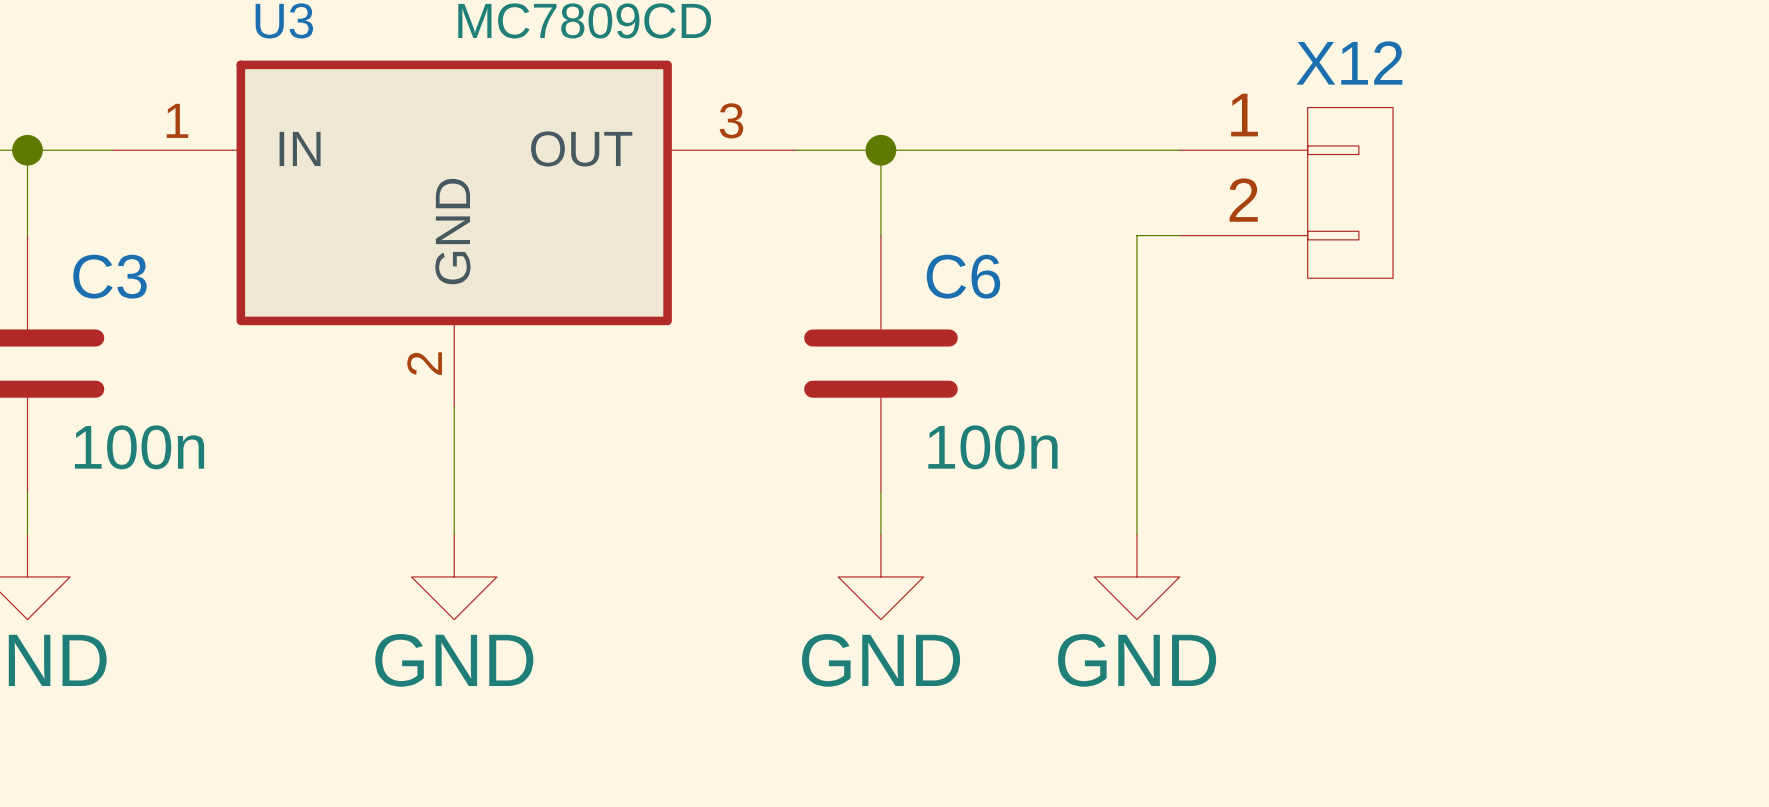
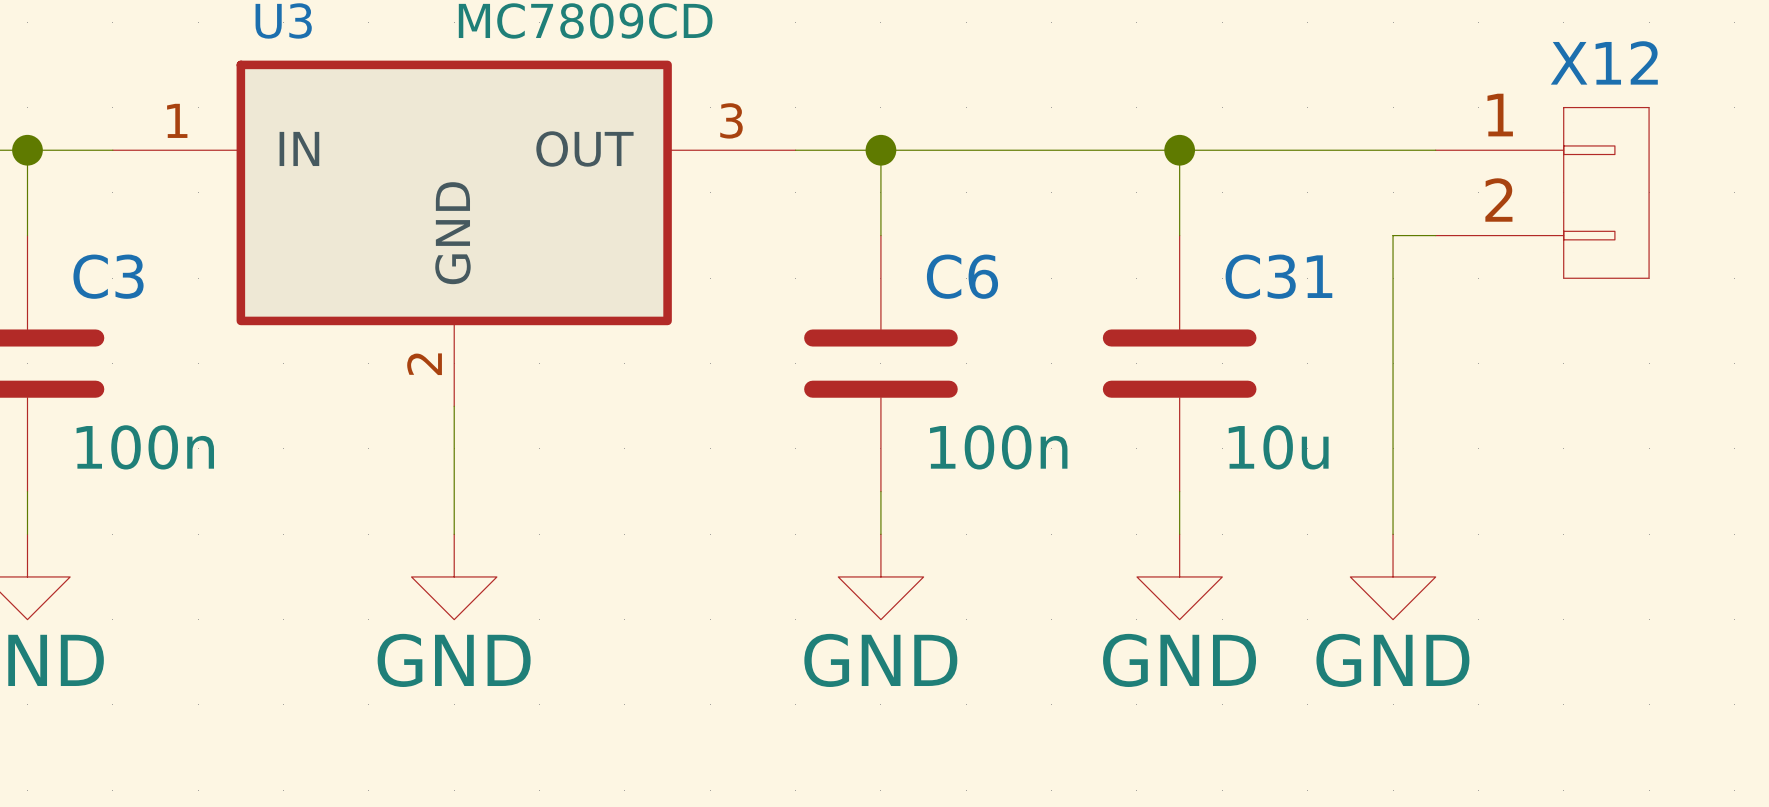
junction: none -> (1179, 150)
X12 position: (1286, 192) -> (1542, 192)
wire: (1179, 235) (1136, 235) (1136, 534) -> (1179, 235) (1179, 150) (1435, 150)
wire: none -> (1435, 235) (1393, 235) (1393, 534)
C31: none -> 10u (1179, 363)
wire: none -> (1179, 491) (1179, 534)
power symbol position: GND (1136, 576) -> GND (1179, 576)
power symbol: none -> GND (1393, 576)

